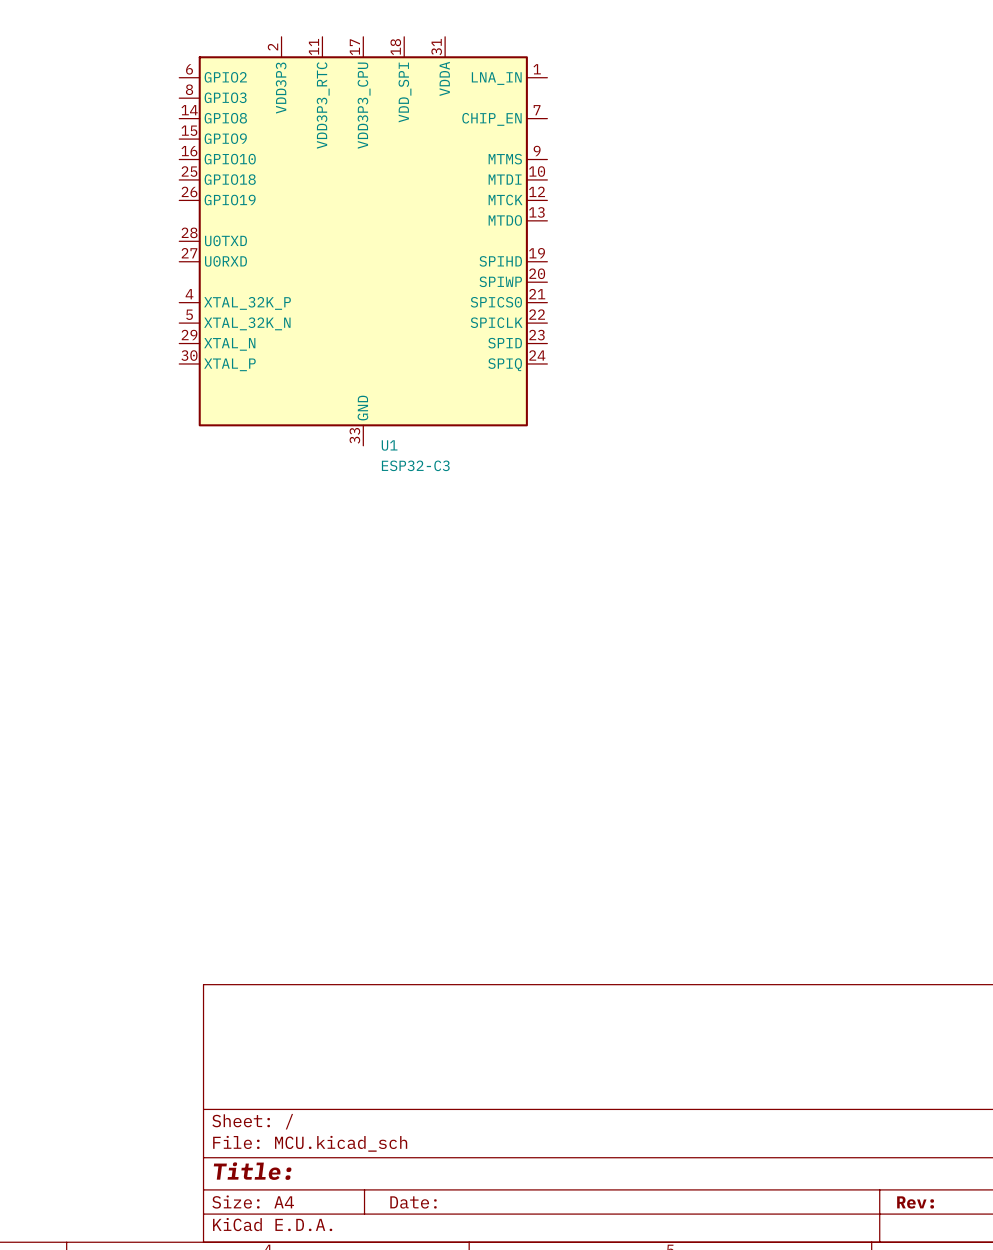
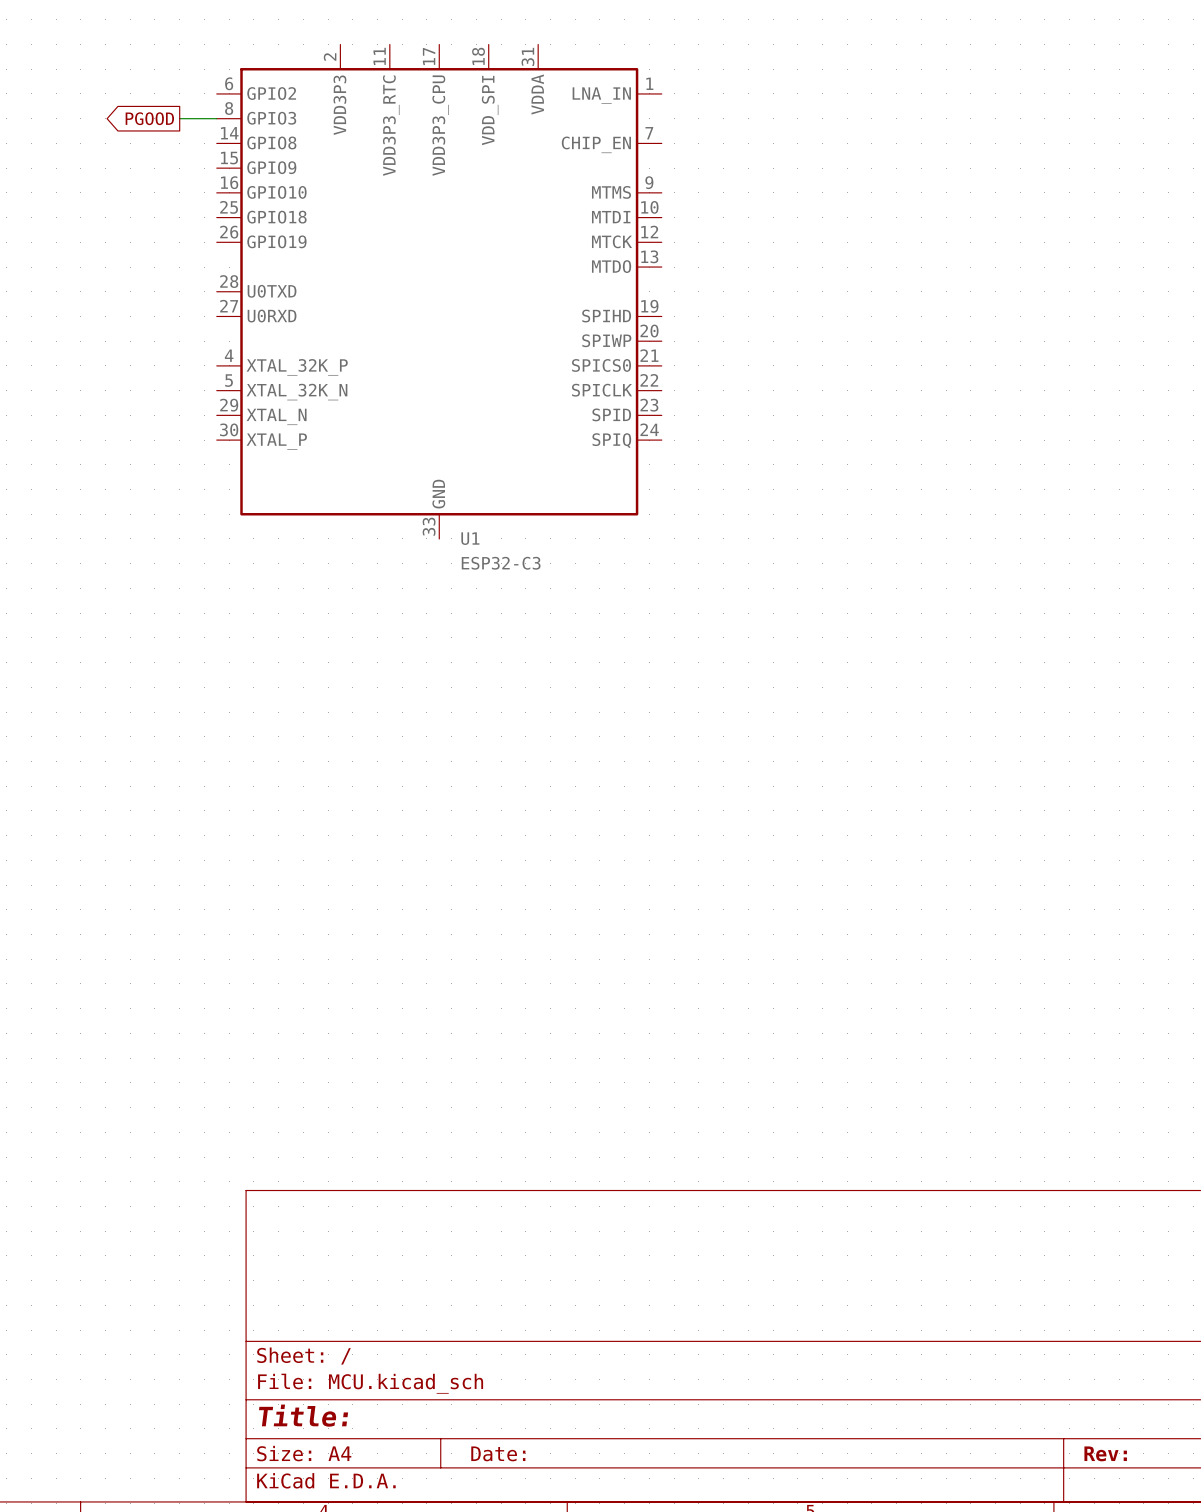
global label: none -> PGOOD (149, 118)
wire: none -> (179, 118) (216, 118)

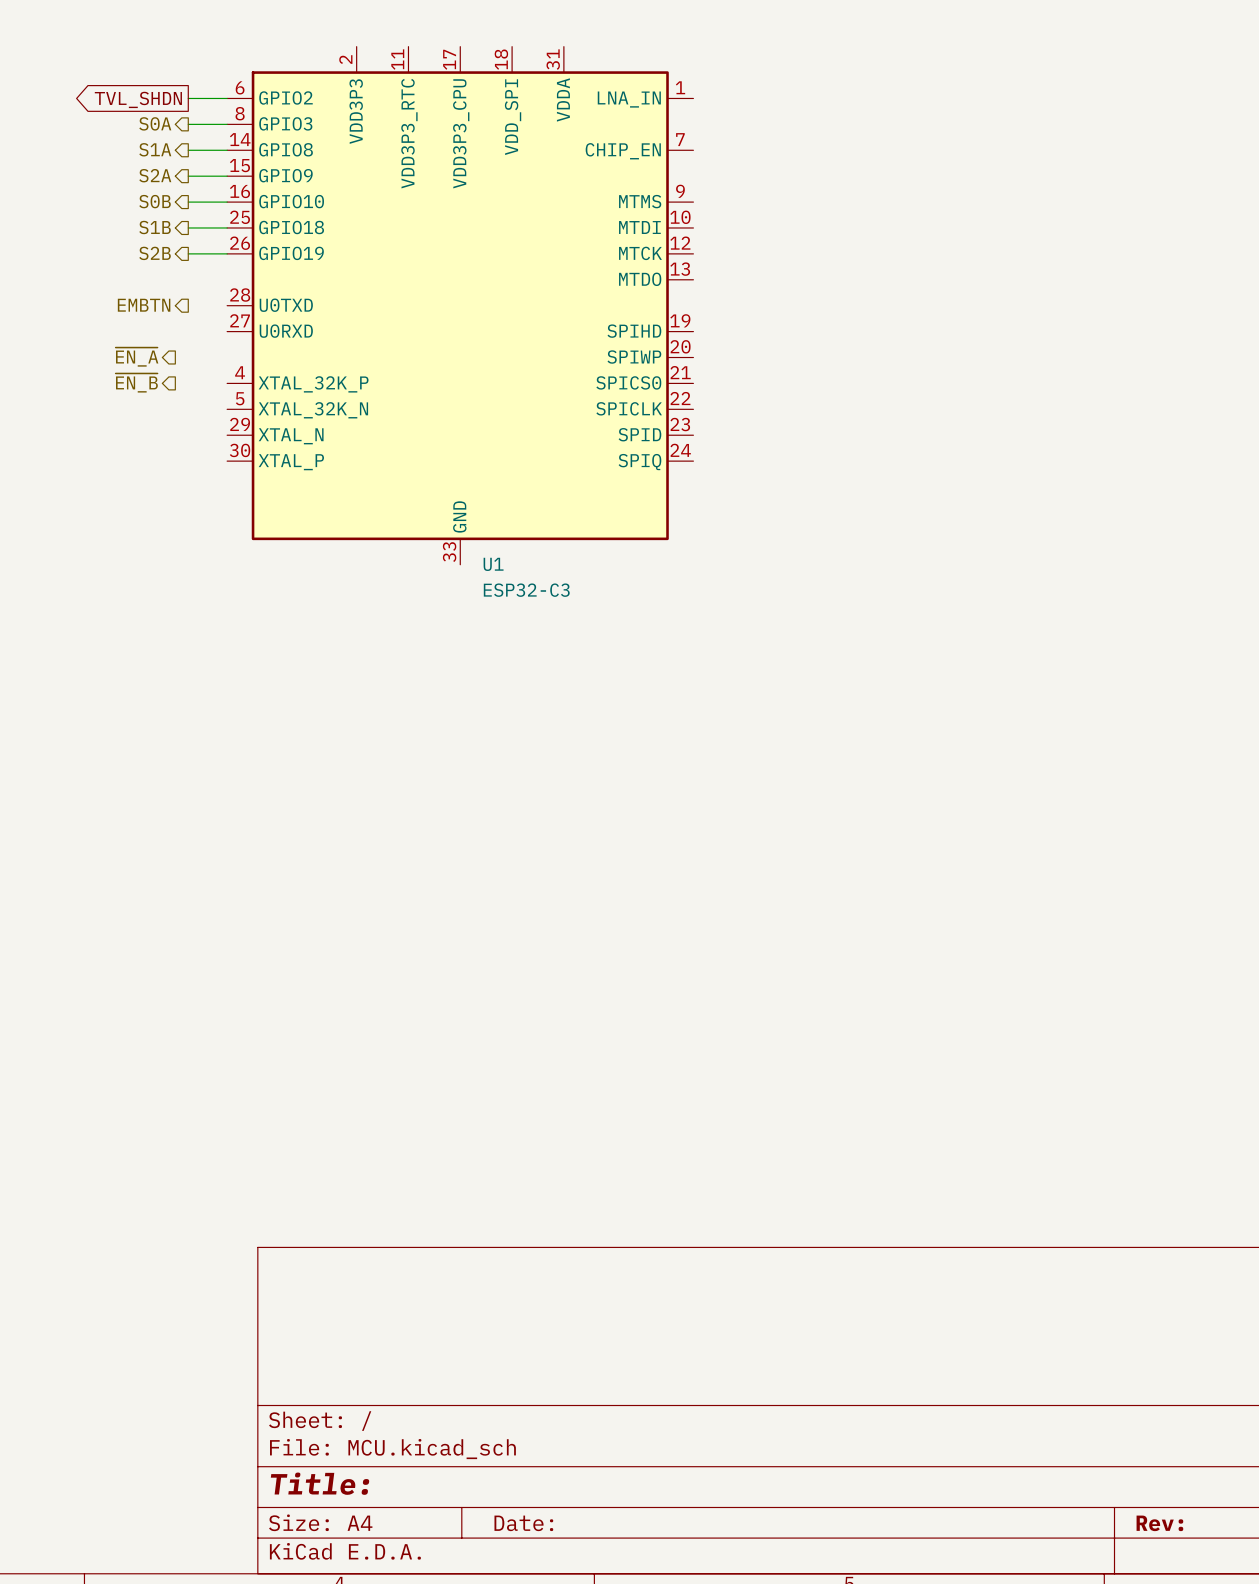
wire: none -> (188, 98) (227, 98)
global label: none -> TVL_SHDN (138, 99)
global label: PGOOD (149, 118) -> none
hierarchical label: none -> S0A (155, 123)
hierarchical label: none -> S1A (155, 149)
wire: none -> (188, 150) (227, 150)
hierarchical label: none -> S2A (155, 175)
wire: none -> (188, 176) (227, 176)
hierarchical label: none -> S0B (155, 201)
wire: none -> (188, 202) (227, 202)
hierarchical label: none -> S1B (155, 227)
wire: none -> (188, 227) (227, 227)
hierarchical label: none -> S2B (155, 253)
wire: none -> (188, 253) (227, 253)
hierarchical label: none -> EMBTN (144, 305)
hierarchical label: none -> ~{EN_A} (136, 357)
hierarchical label: none -> ~{EN_B} (136, 383)

